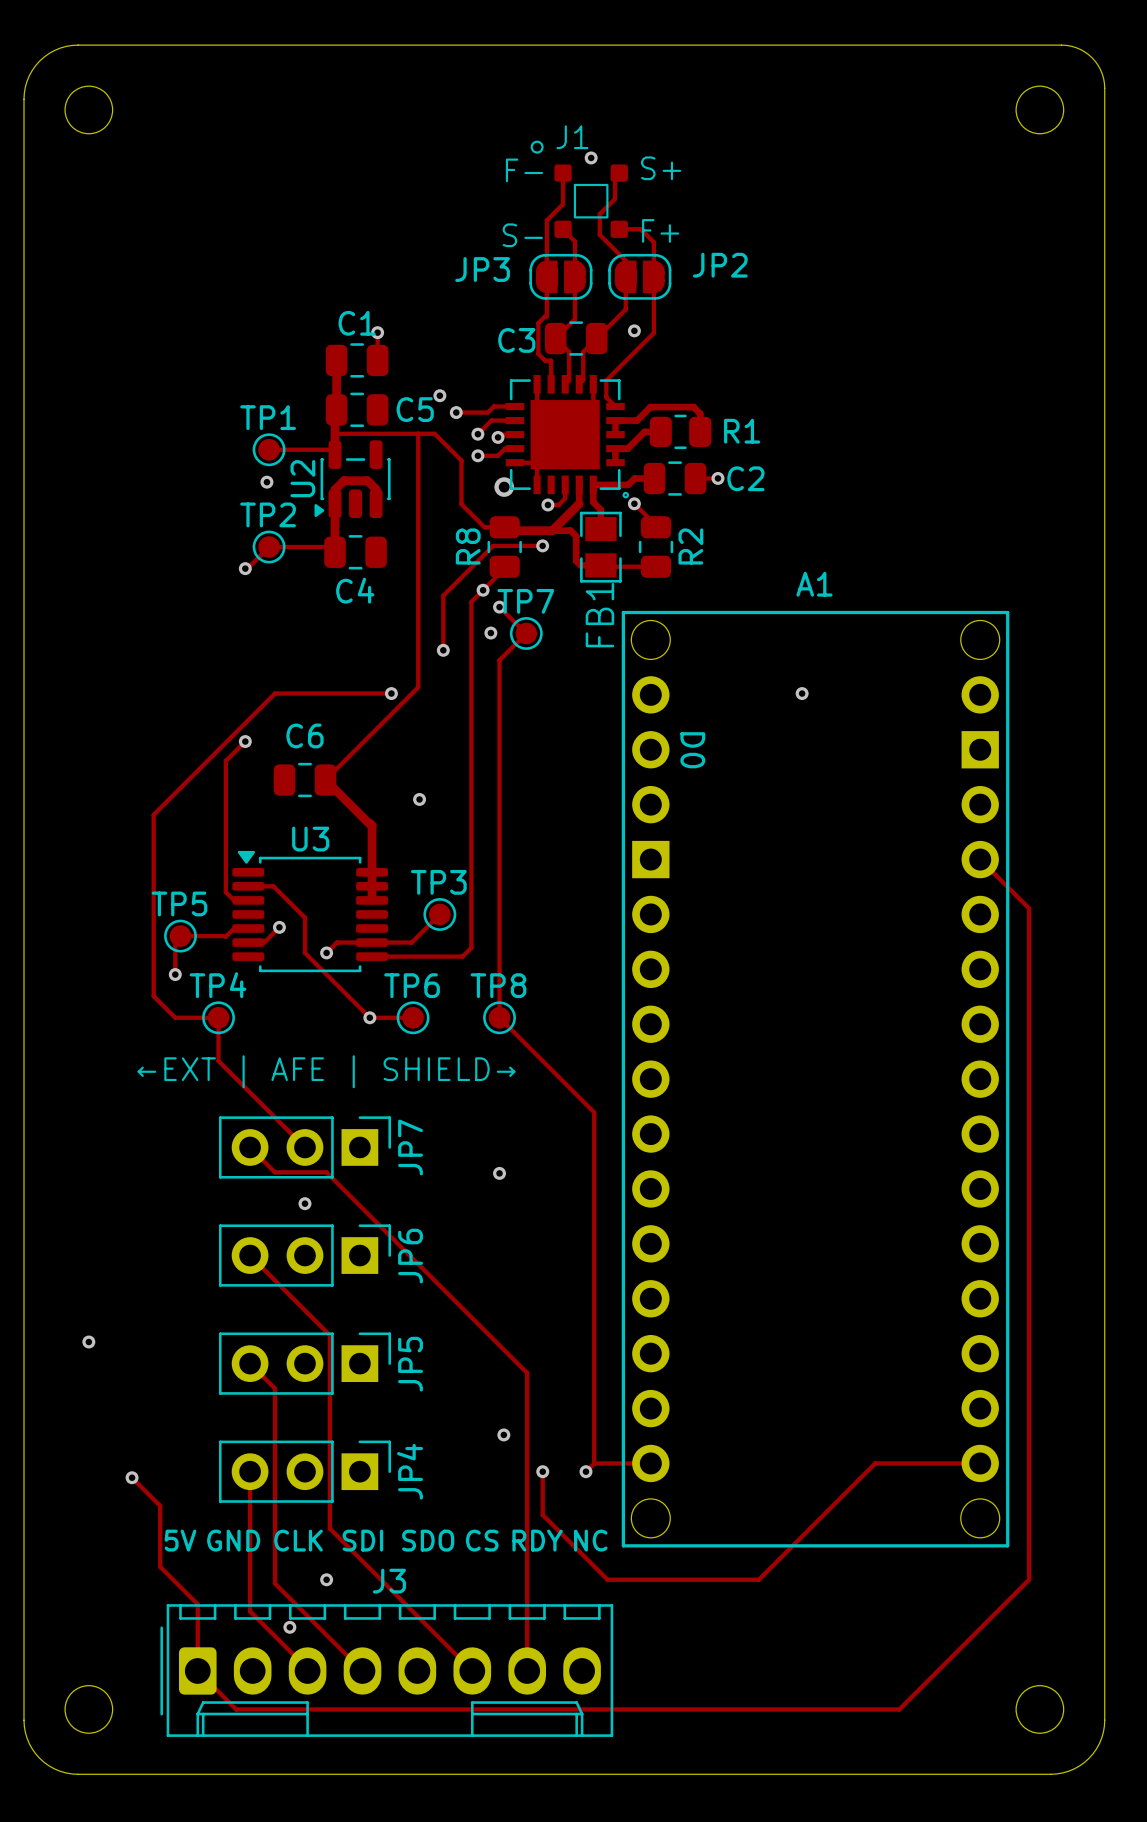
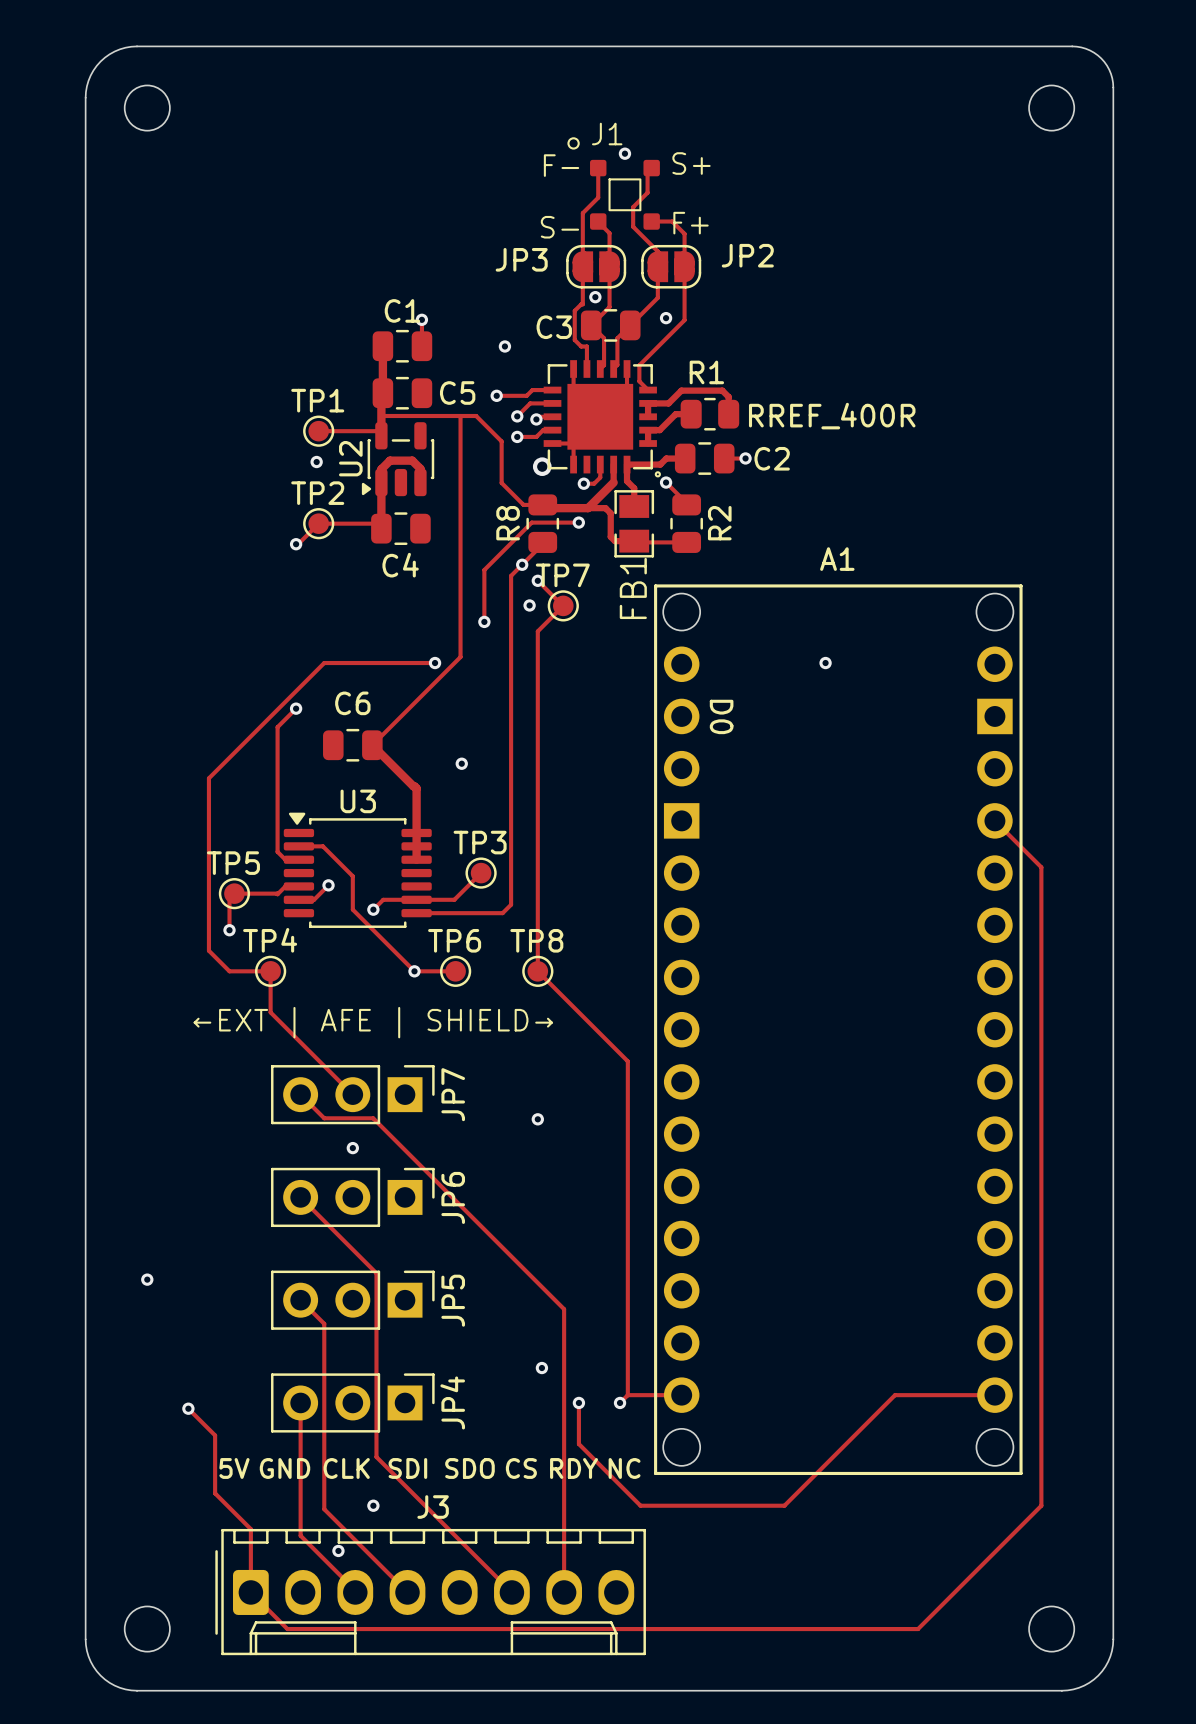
via: none -> (595, 297)
via position: (439, 395) -> (504, 346)
R1 name position: R1 (742, 431) -> R1 (706, 372)
R1 text: none -> RREF_400R (832, 416)

